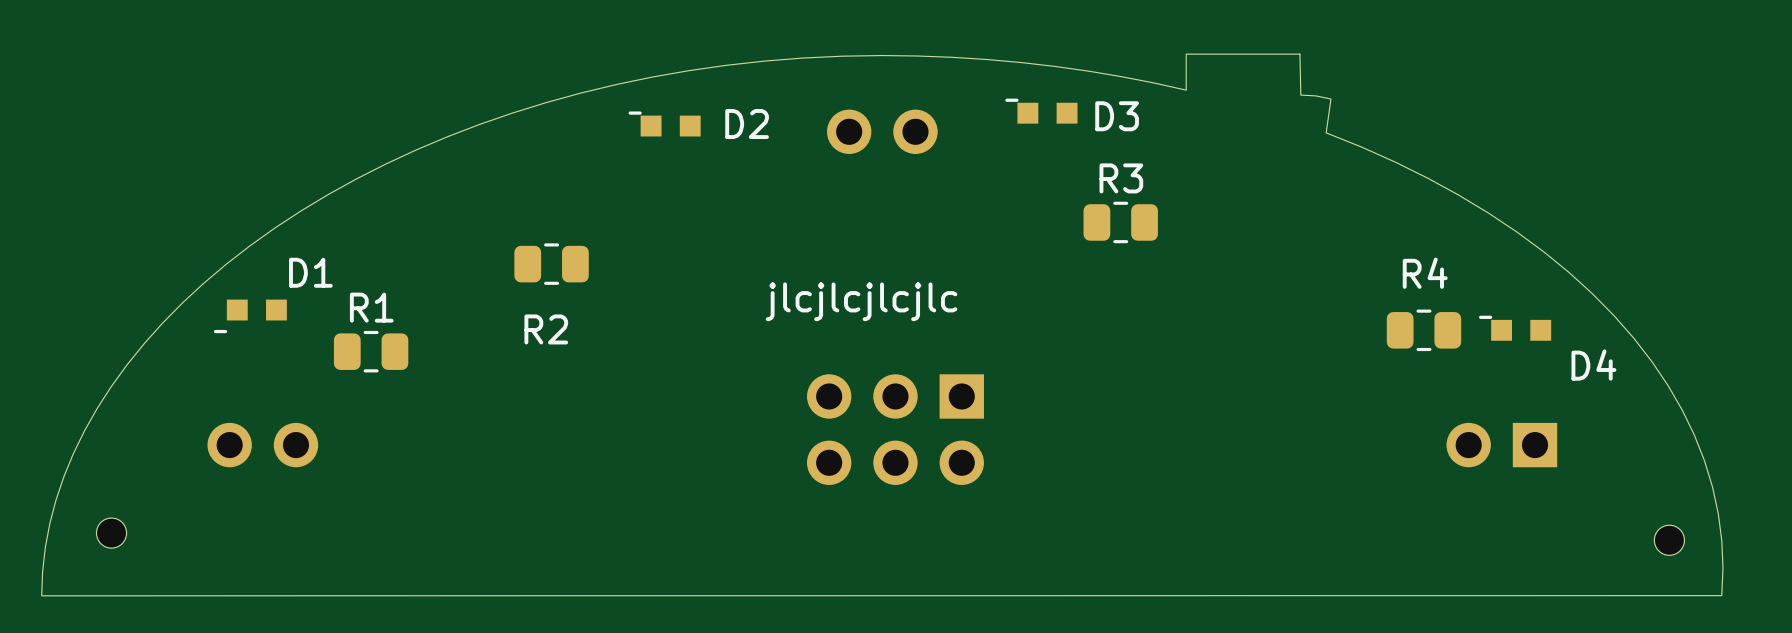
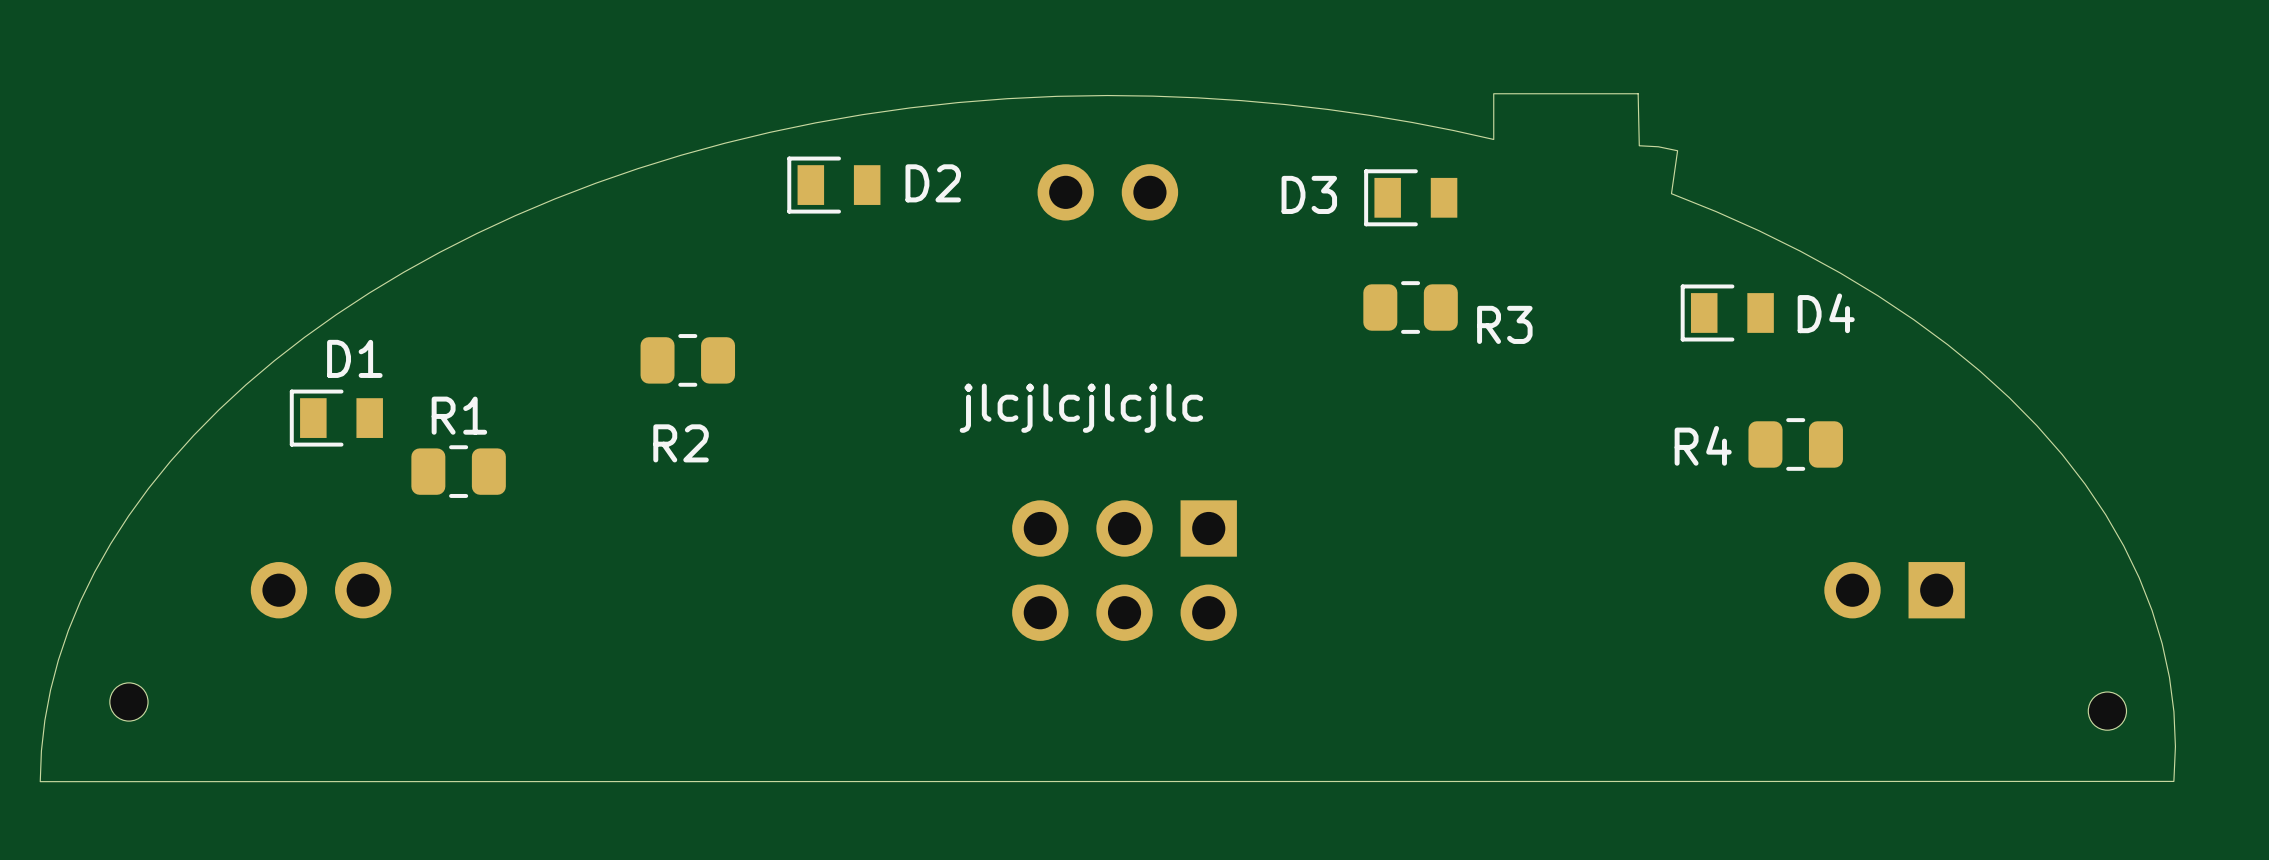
D3 footprint: [1017, 102, 1078, 124] -> [1364, 169, 1458, 227]
D2 footprint: [640, 115, 701, 137] -> [787, 156, 881, 214]
D3 name position: D3 (1117, 116) -> D3 (1309, 194)
R3 name position: R3 (1121, 178) -> R3 (1504, 324)
R4 name position: R4 (1425, 273) -> R4 (1703, 445)
D1 footprint: [226, 299, 287, 321] -> [289, 389, 383, 447]
D4 footprint: [1491, 319, 1552, 341] -> [1680, 284, 1774, 342]

